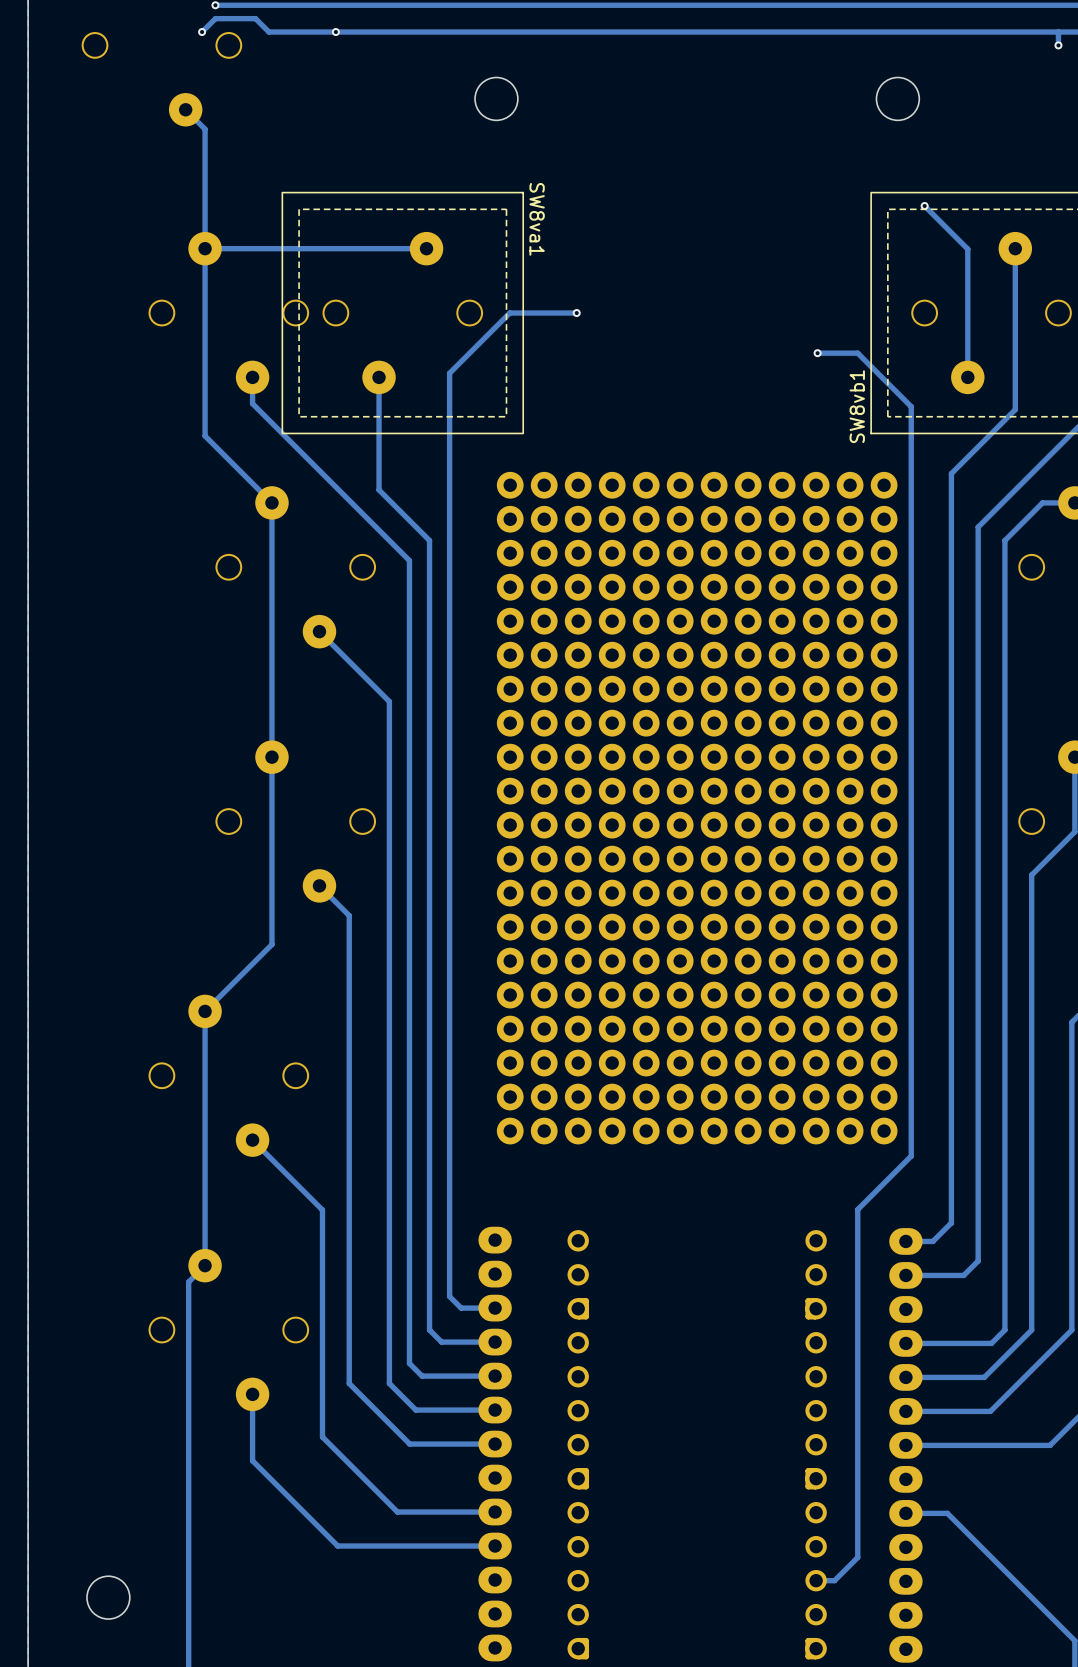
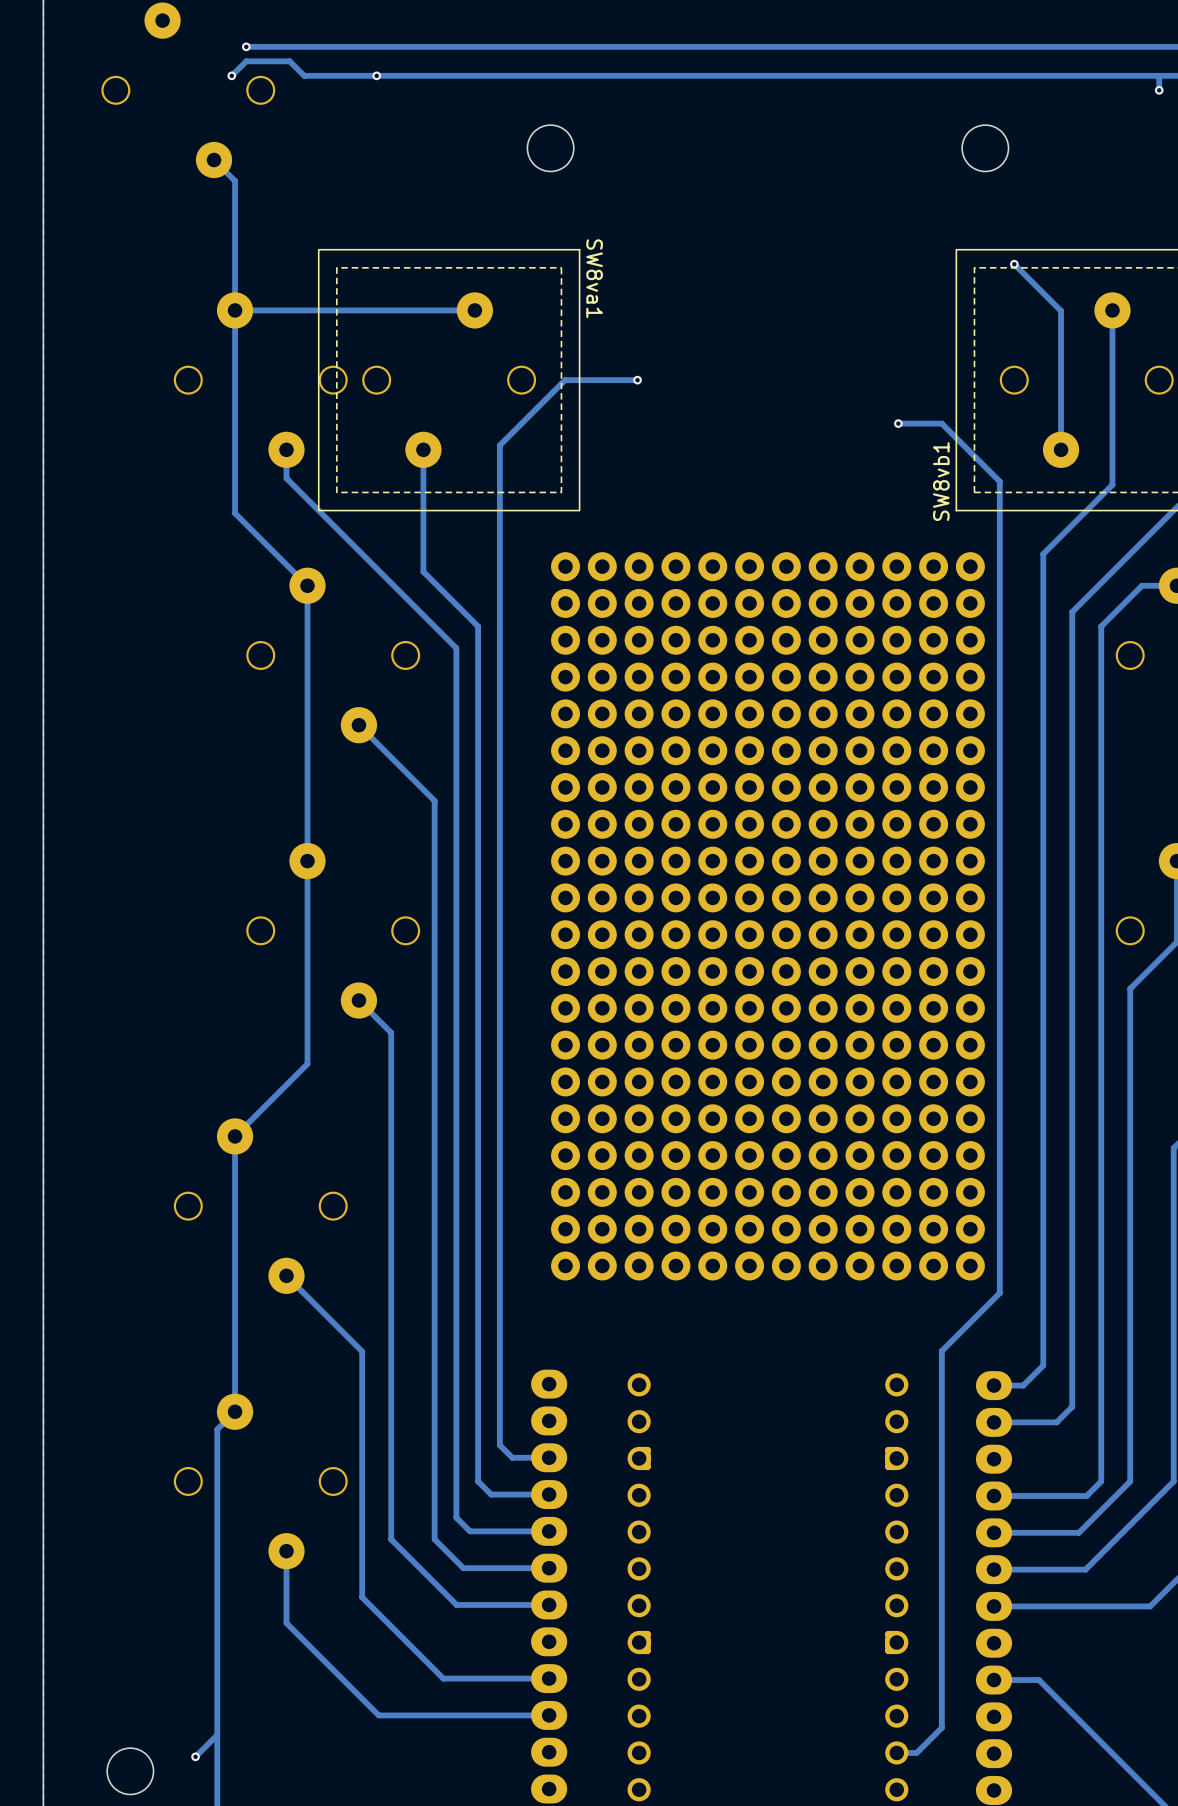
track: none -> (217, 1735) (195, 1756)
via: none -> (195, 1756)

